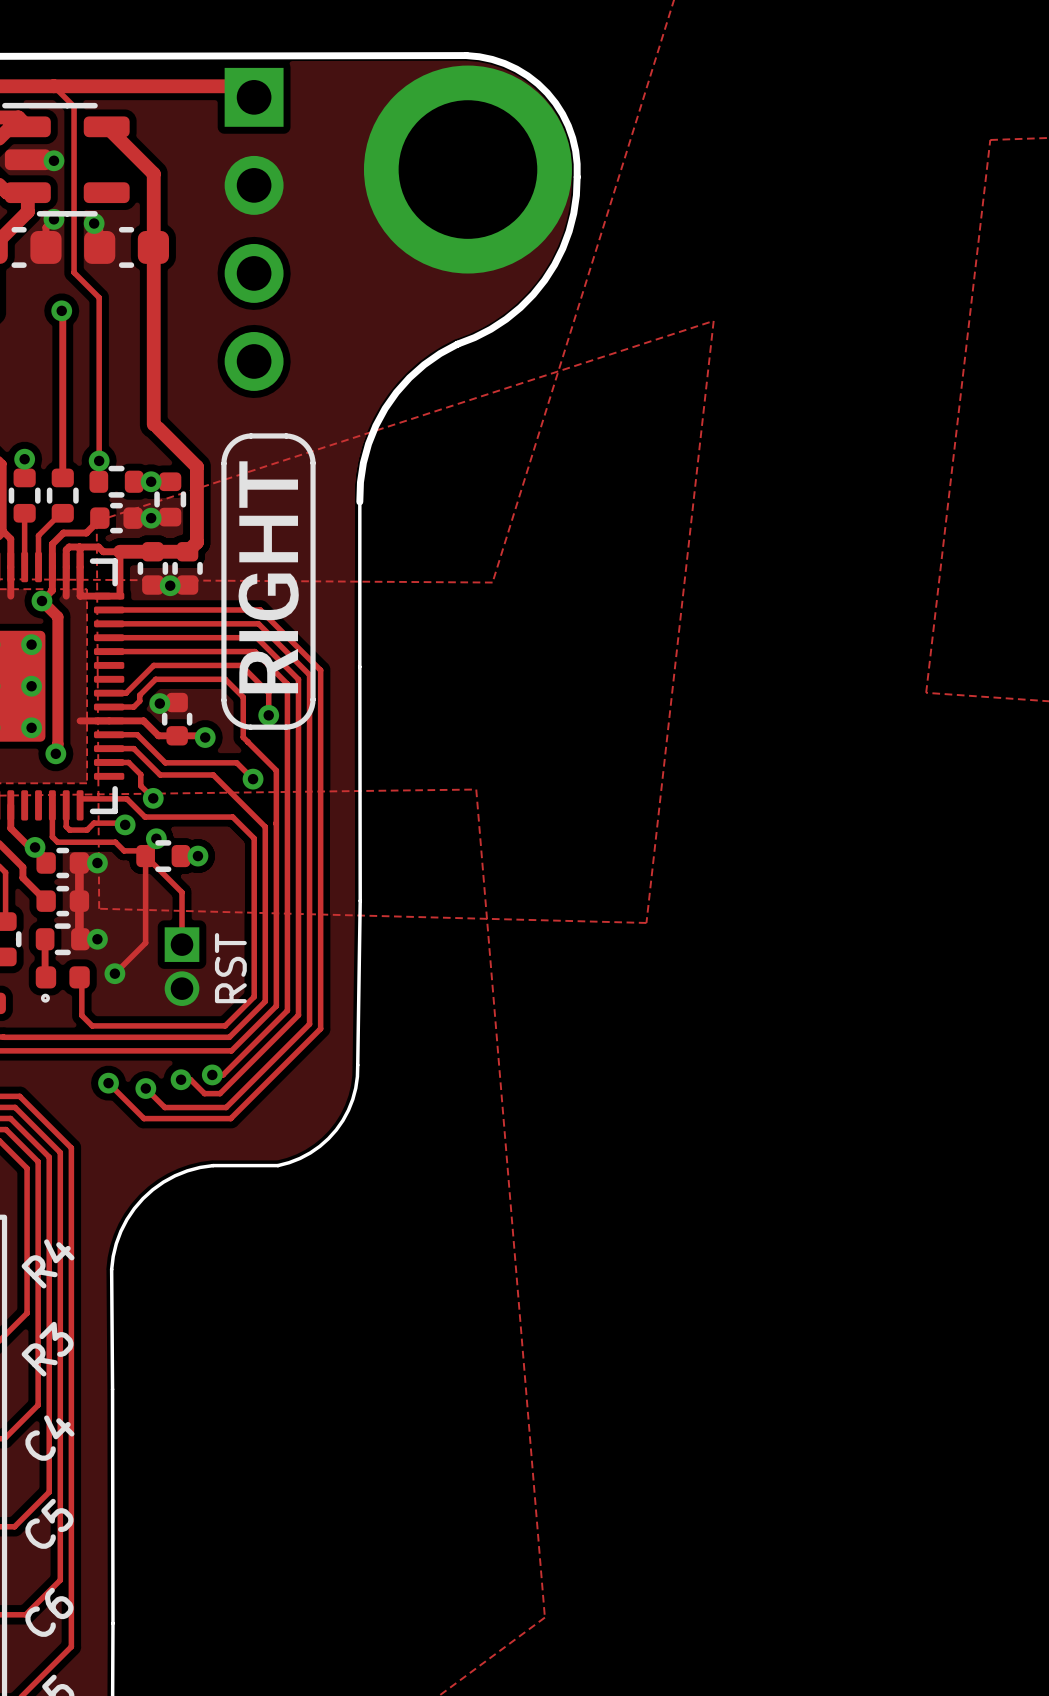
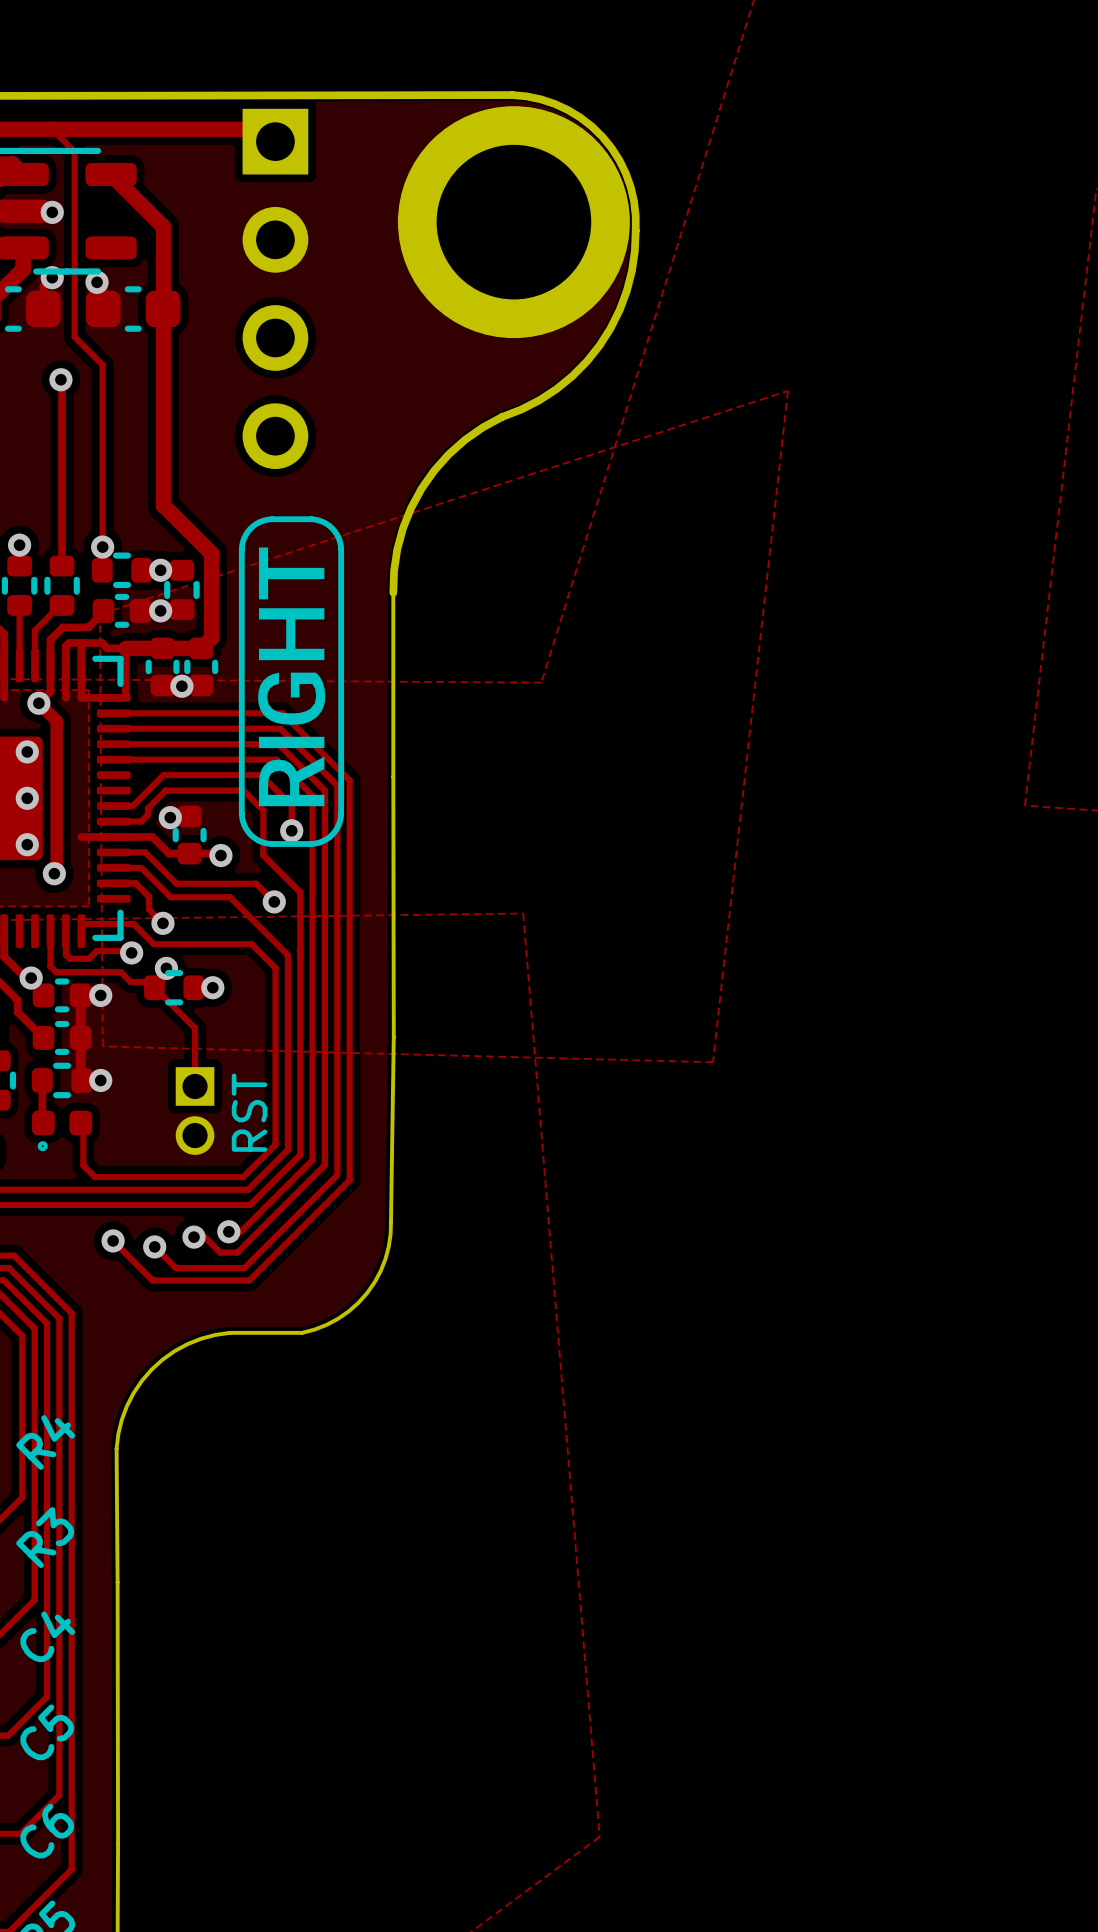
track: (145, 856) (145, 942) (114, 973) -> none
via: (114, 973) -> none

